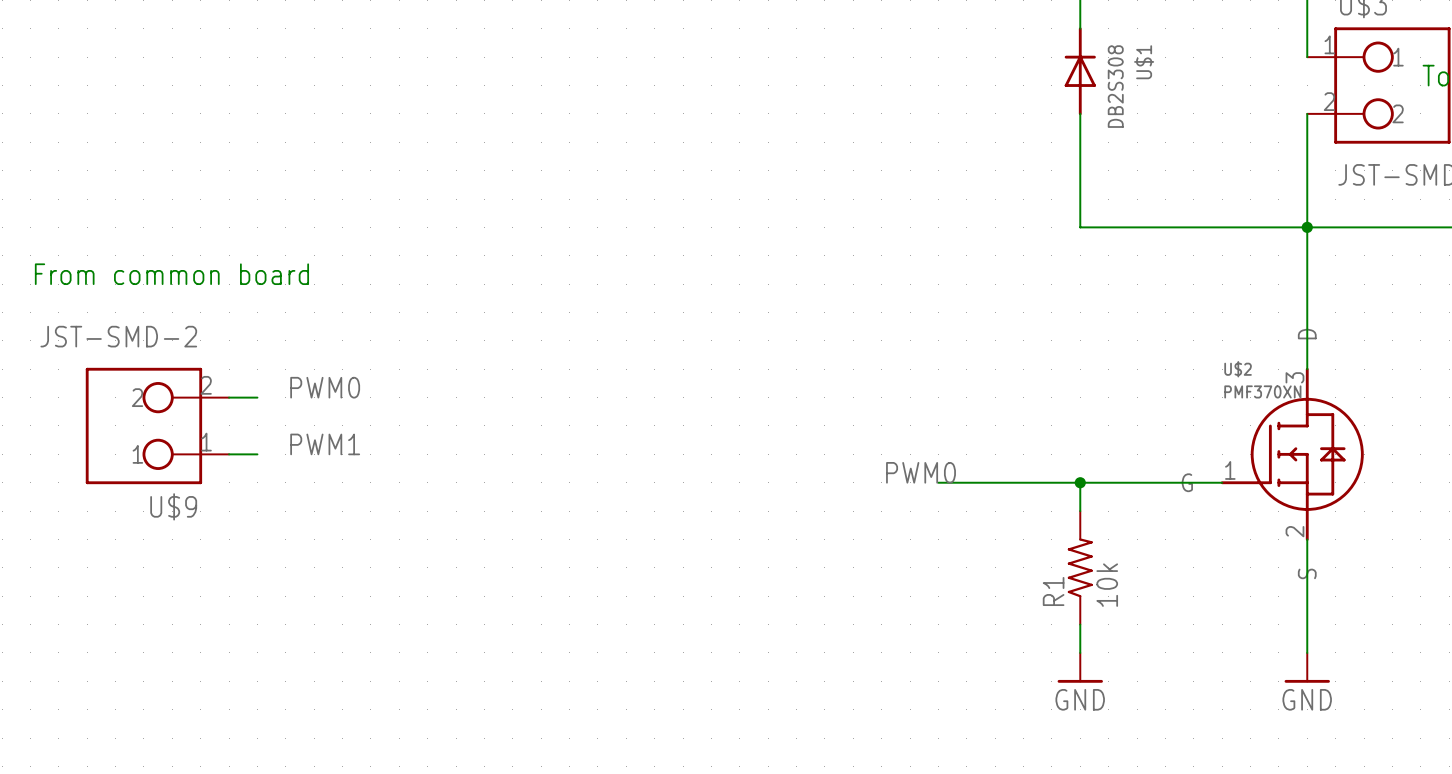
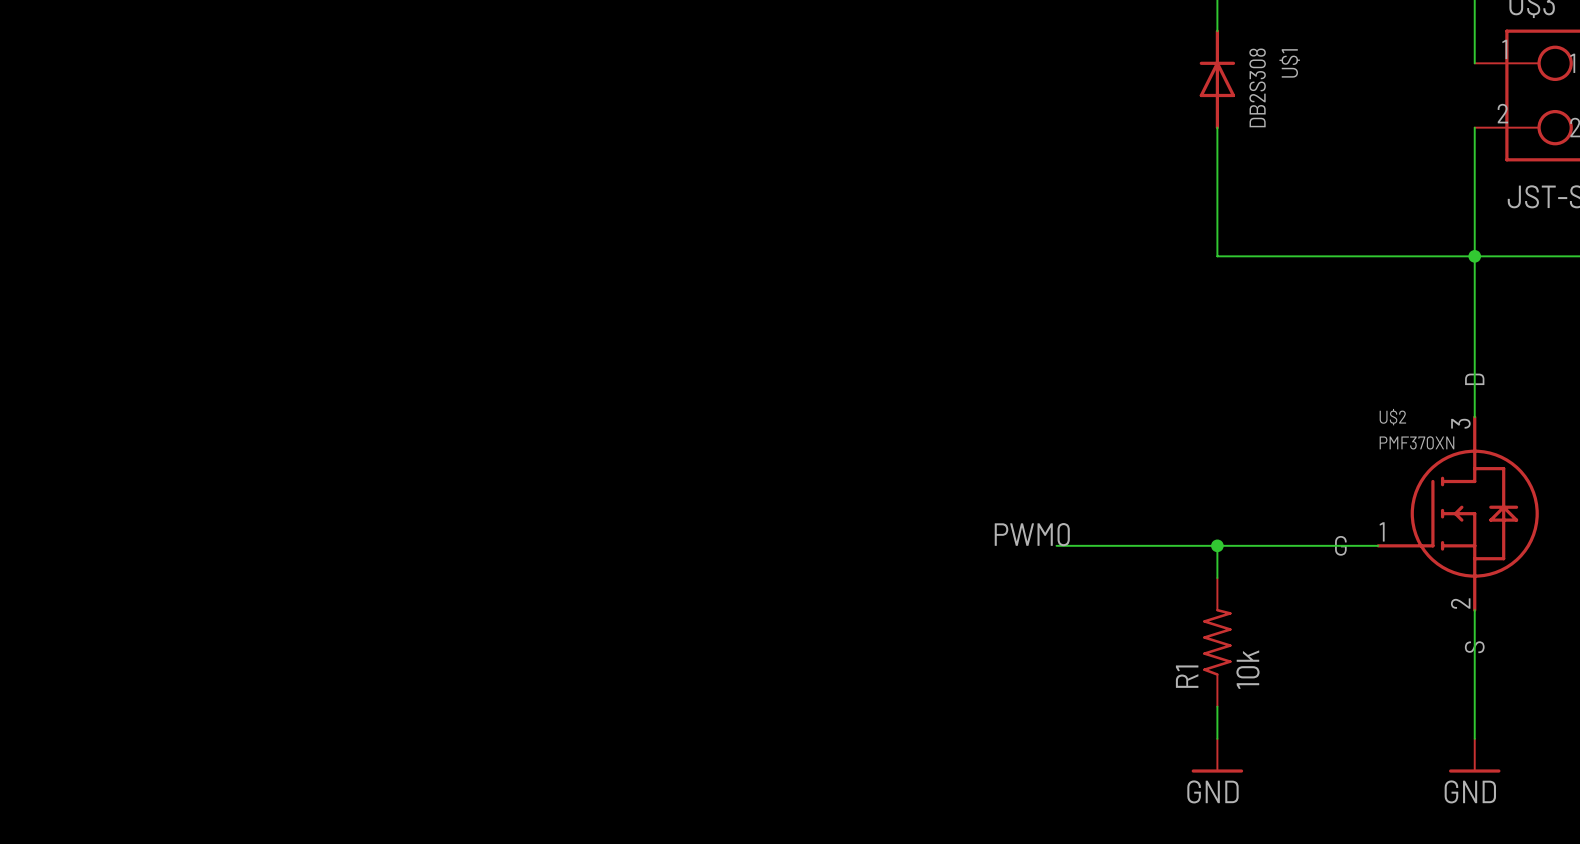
text: From common board (171, 274) -> none
label: PWM0 (325, 387) -> none
wire: (229, 397) (257, 397) -> none
U$9: JST-SMD-2 (157, 425) -> none
label: PWM1 (325, 444) -> none
wire: (229, 454) (257, 454) -> none

